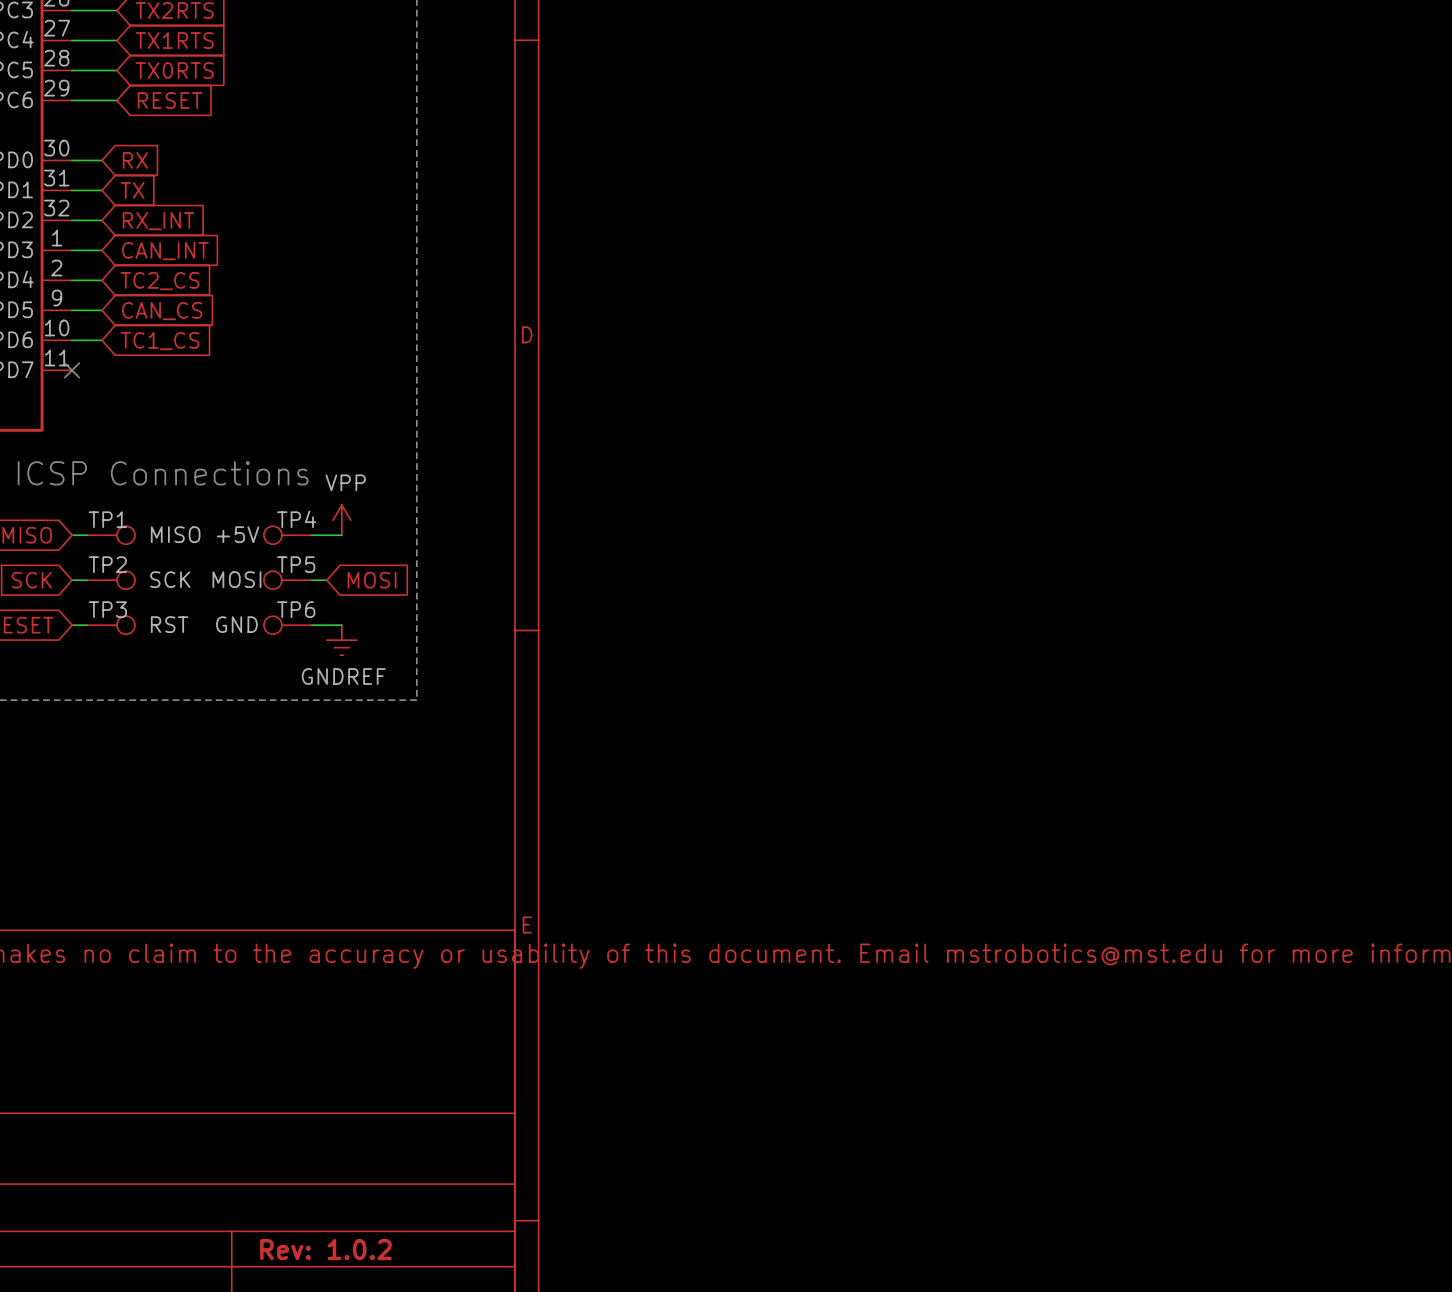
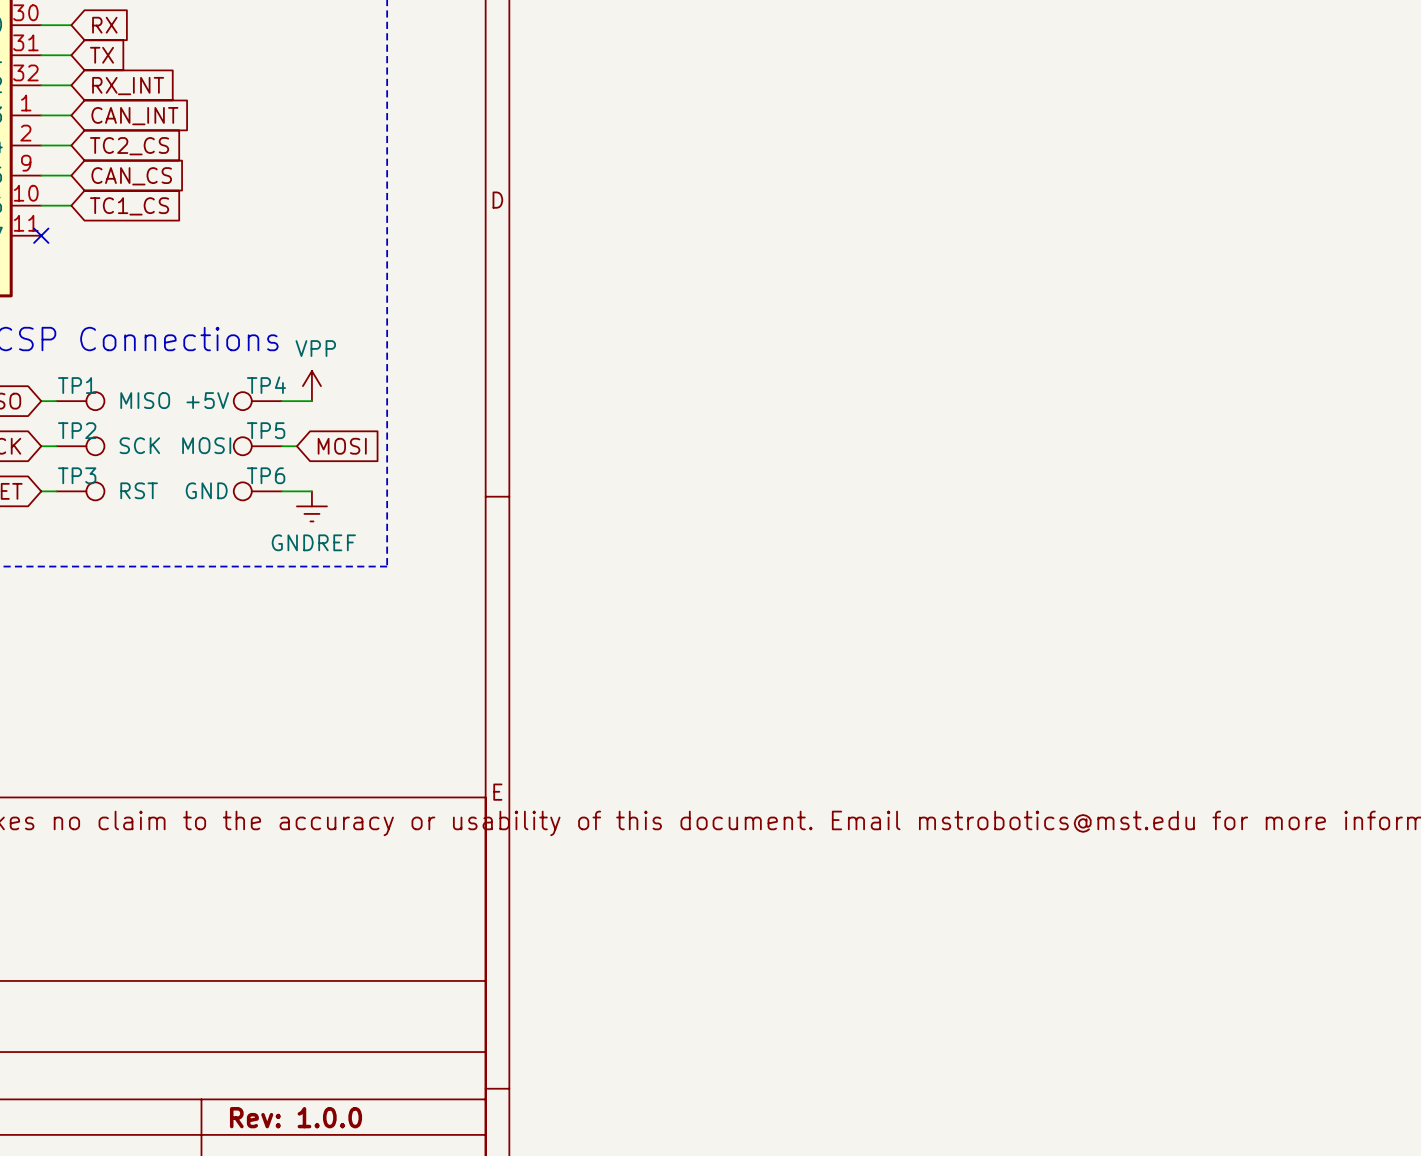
title block: Rev: 1.0.2 (325, 1249) -> Rev: 1.0.0 (296, 1117)

